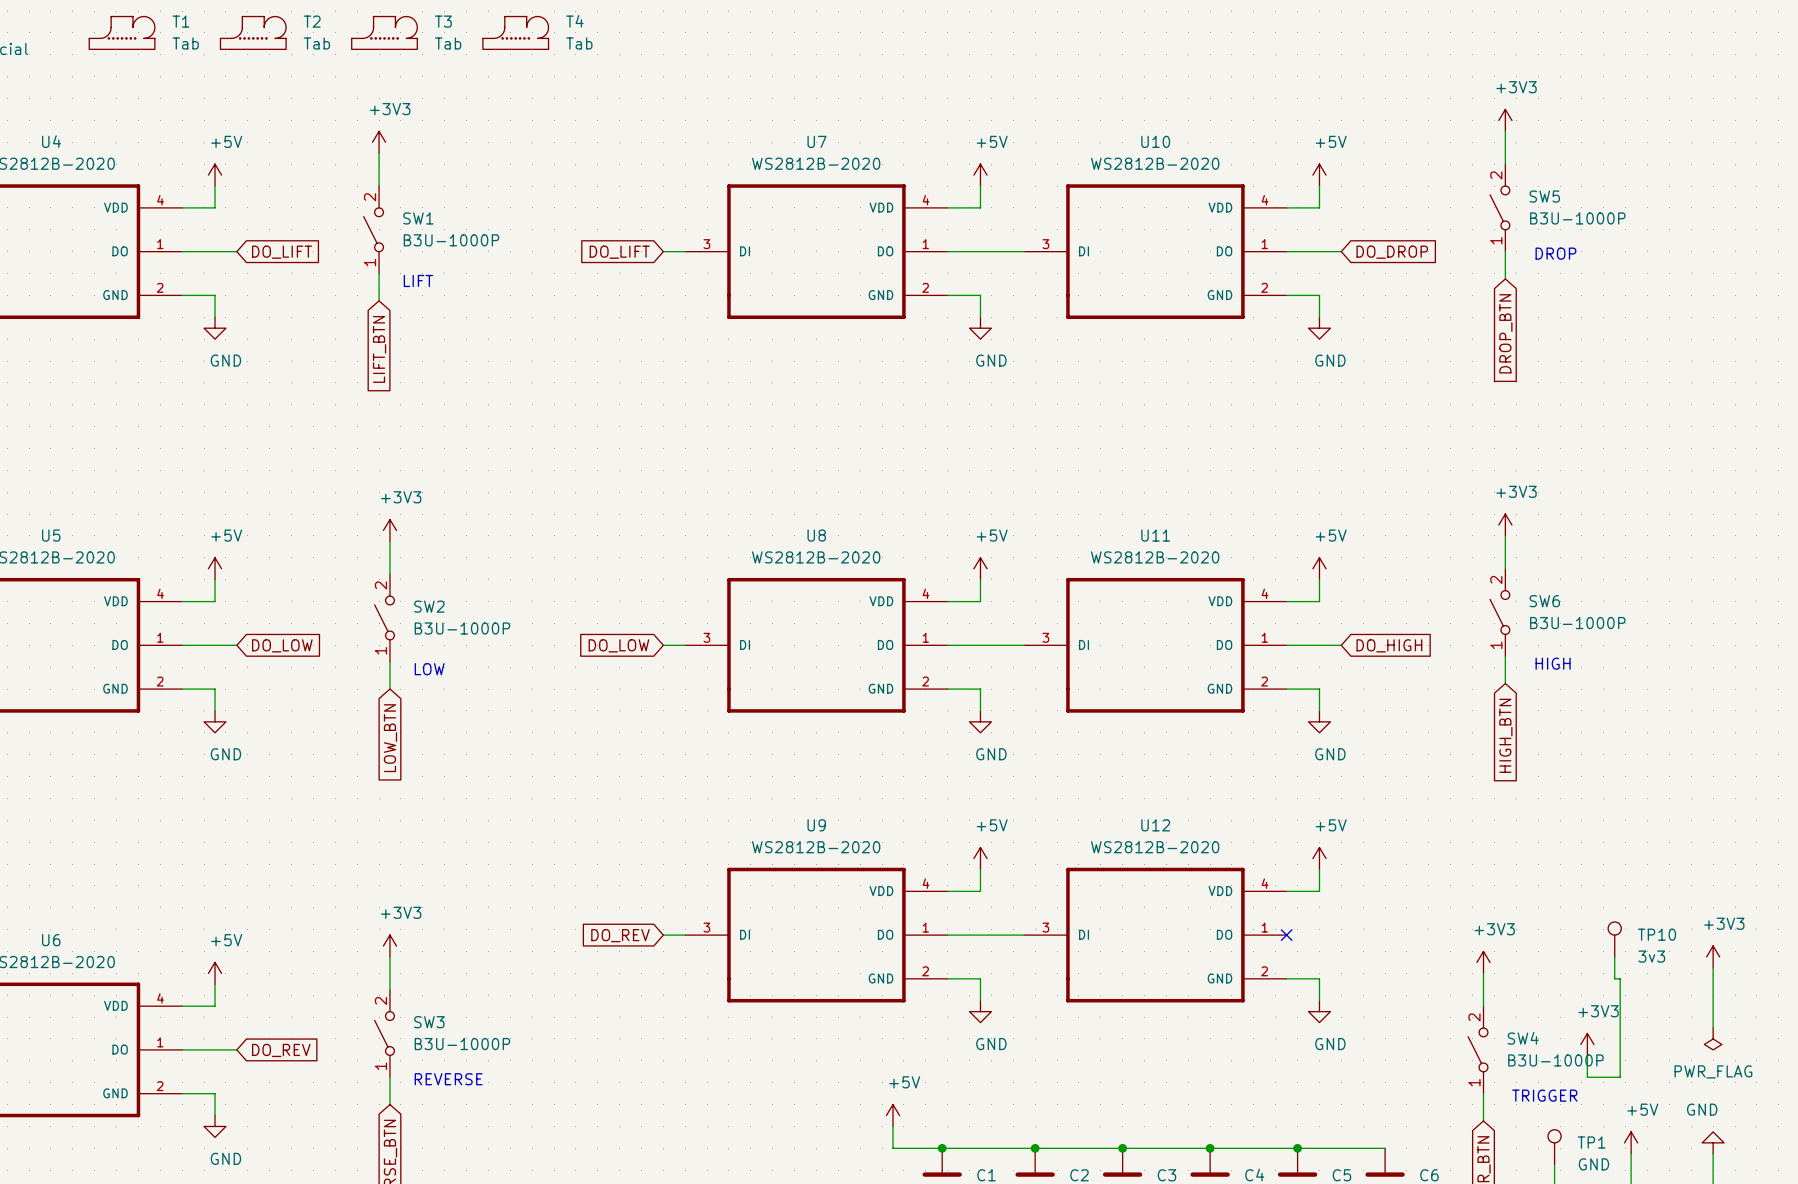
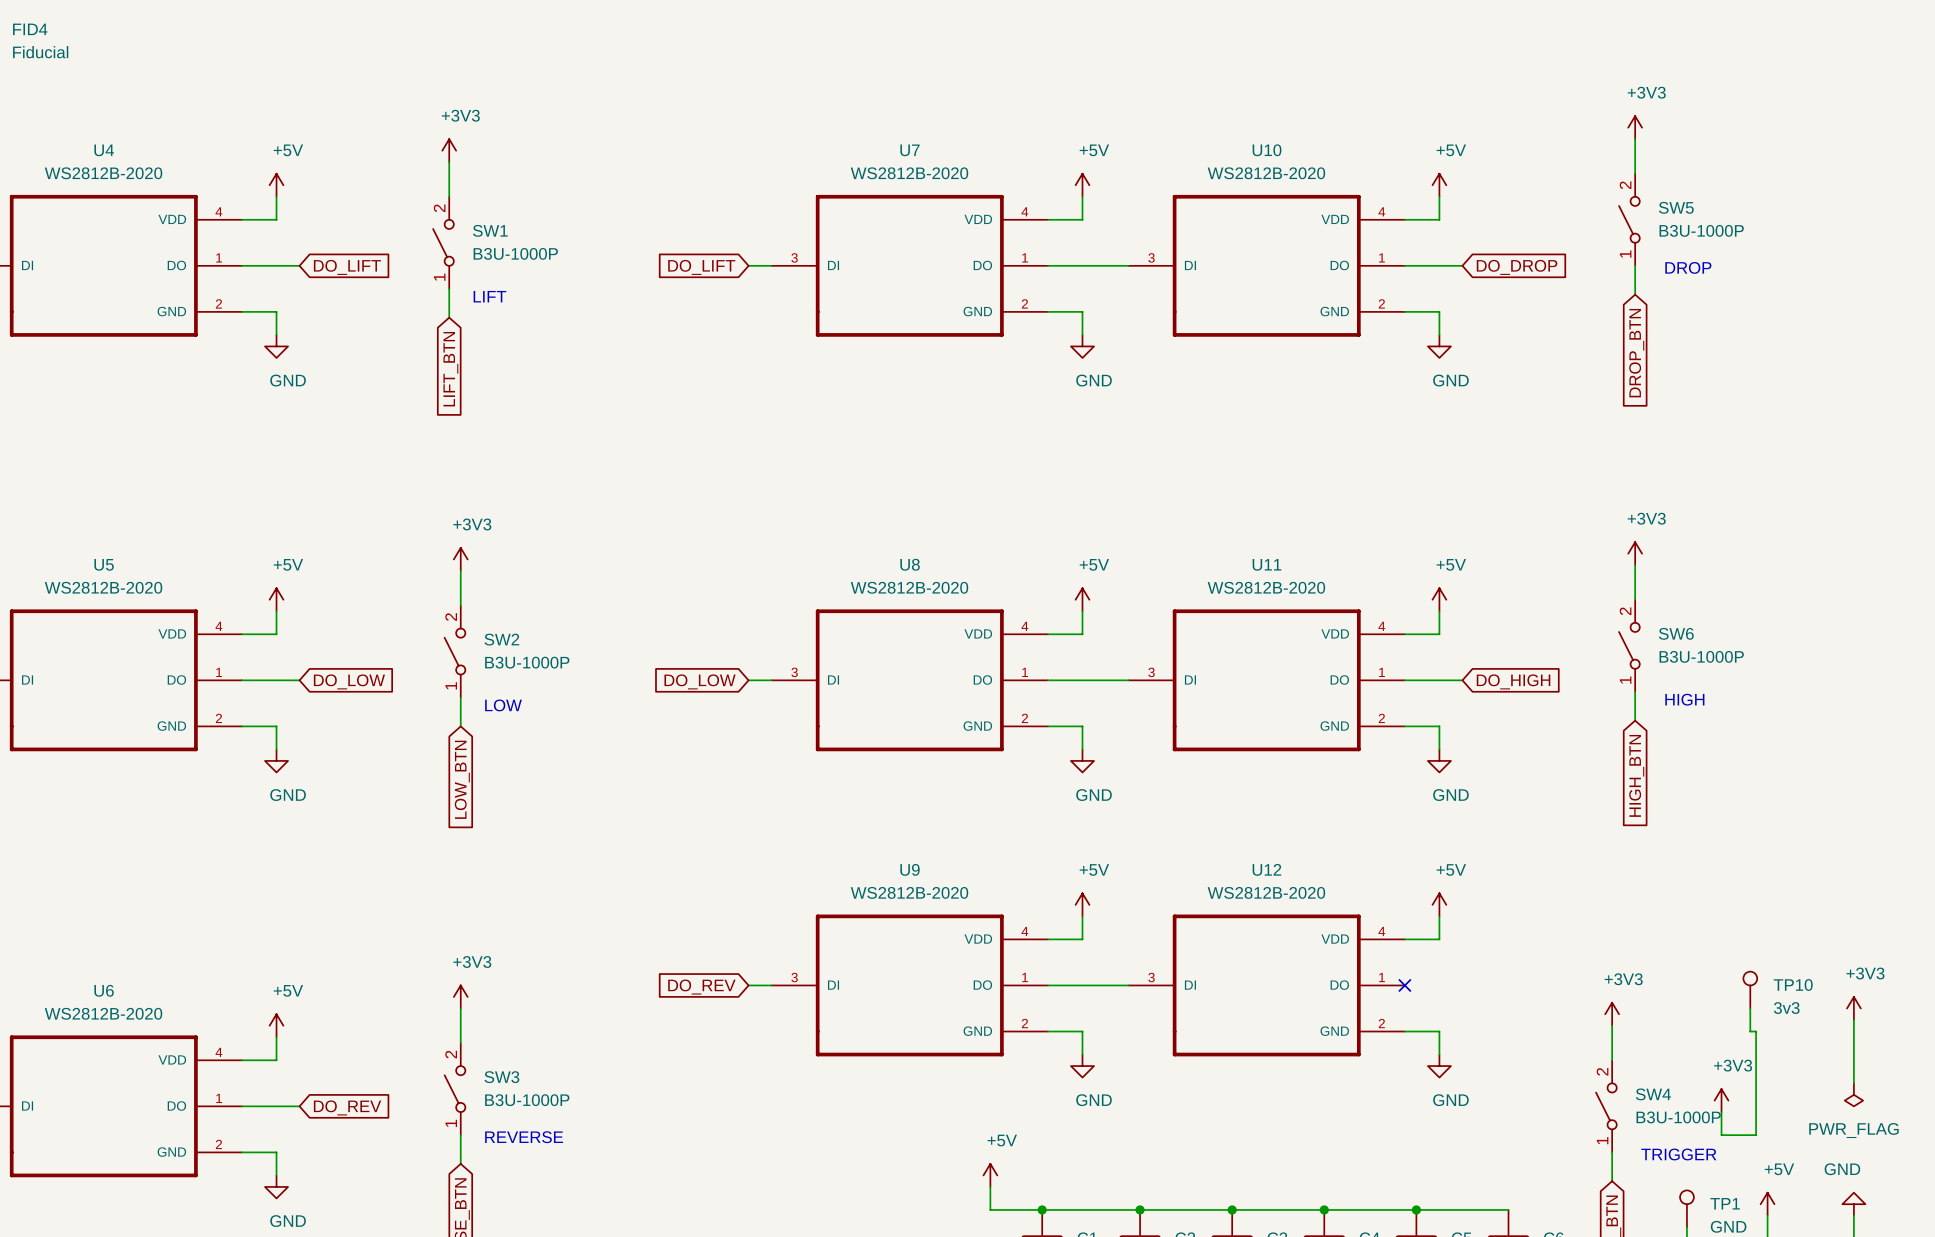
T1: Tab (122, 32) -> none
T2: Tab (253, 32) -> none
T3: Tab (384, 32) -> none
T4: Tab (515, 32) -> none

